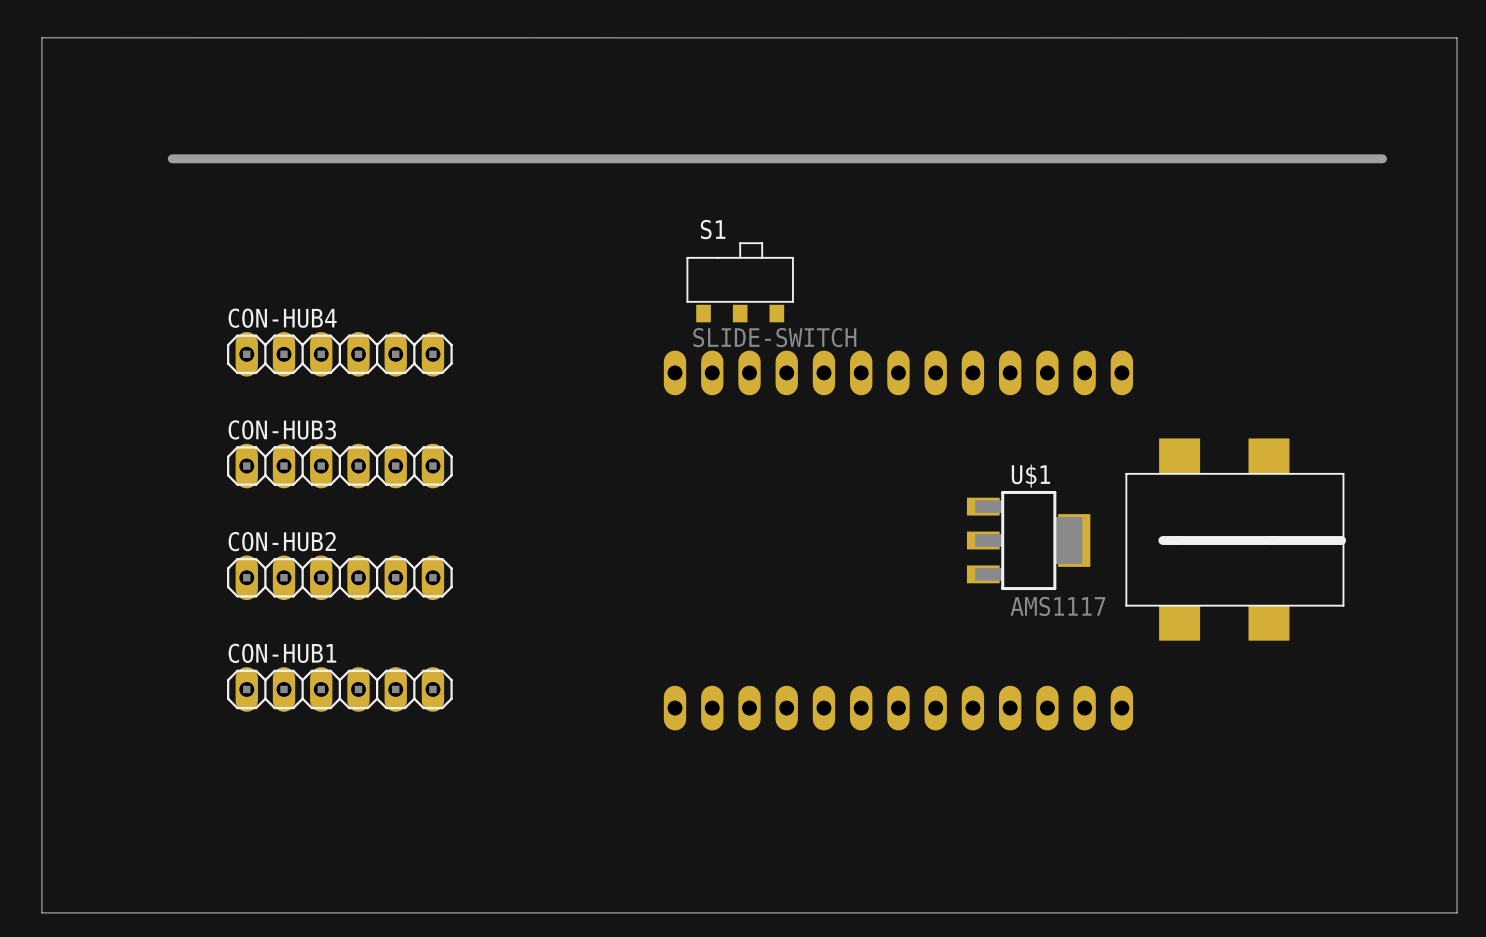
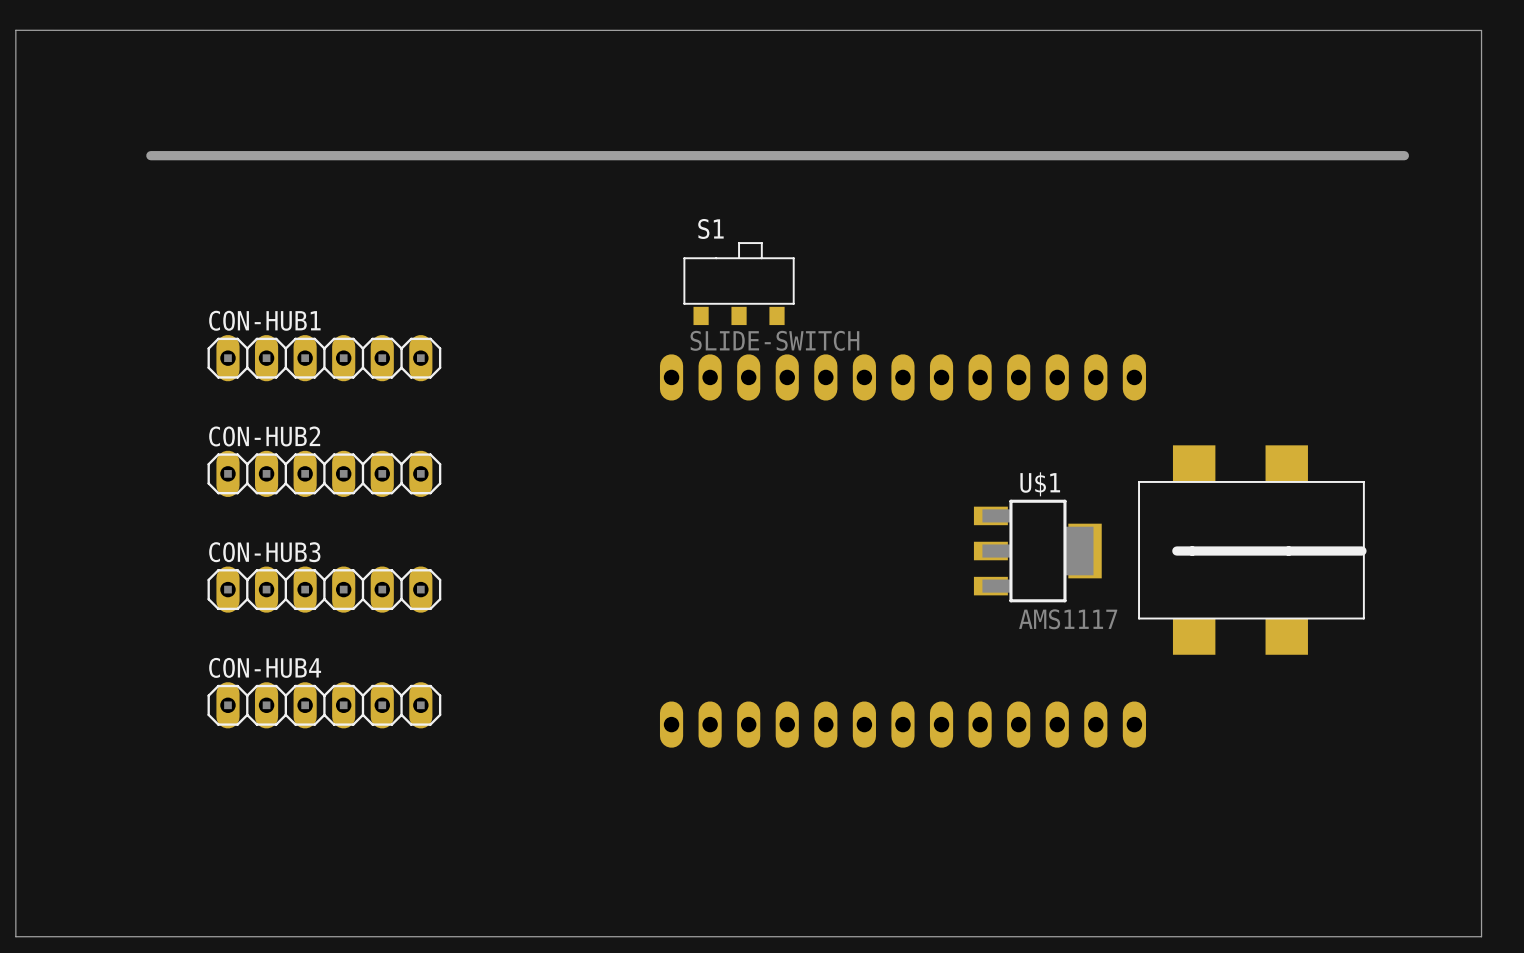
CON-HUB4 name: CON-HUB4 (282, 318) -> CON-HUB1 (264, 320)
CON-HUB3 name: CON-HUB3 (282, 429) -> CON-HUB2 (264, 436)
CON-HUB2 name: CON-HUB2 (282, 541) -> CON-HUB3 (264, 552)
CON-HUB1 name: CON-HUB1 (282, 653) -> CON-HUB4 (265, 667)

